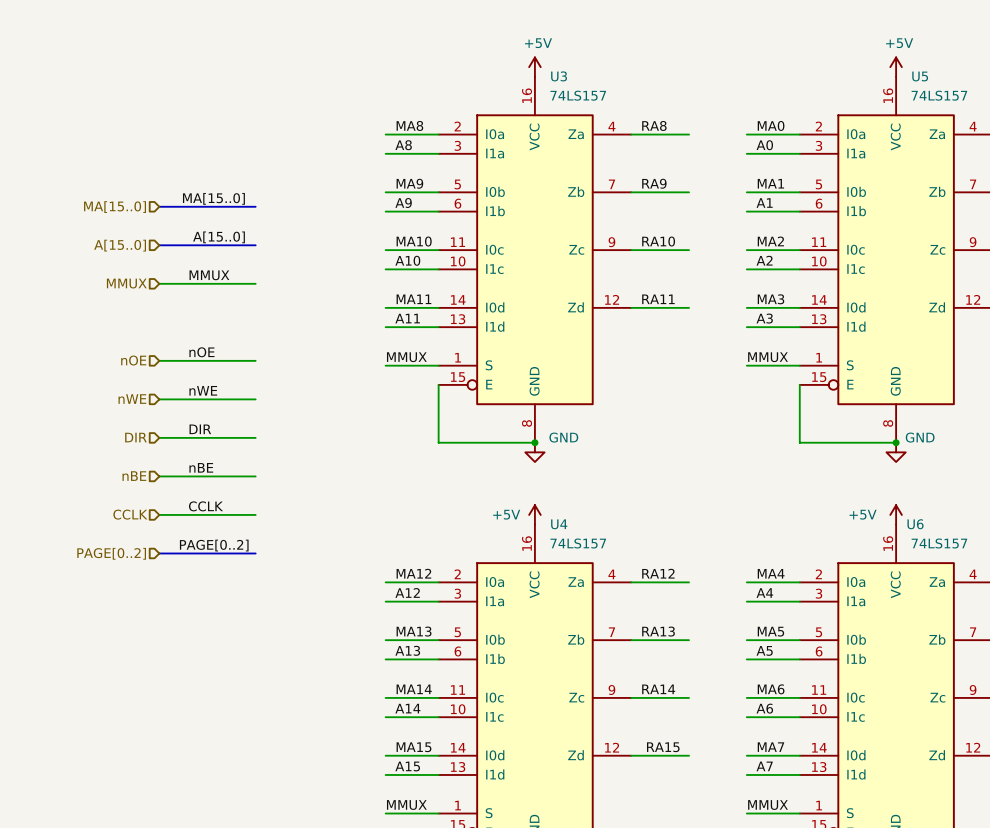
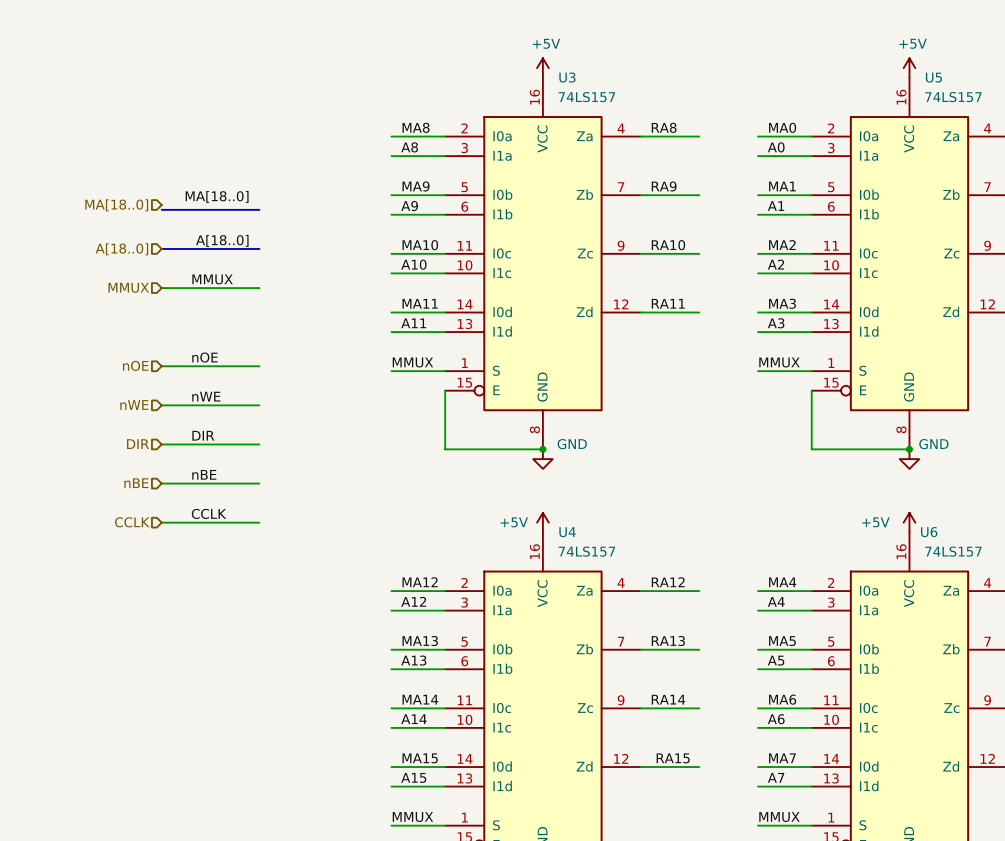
label: MA[15..0] (213, 198) -> MA[18..0] (217, 196)
hierarchical label: MA[15..0] (115, 207) -> MA[18..0] (116, 205)
label: A[15..0] (219, 237) -> A[18..0] (222, 240)
hierarchical label: A[15..0] (120, 245) -> A[18..0] (121, 249)
label: PAGE[0..2] (214, 545) -> none
hierarchical label: PAGE[0..2] (111, 553) -> none
bus: (159, 553) (255, 553) -> none

